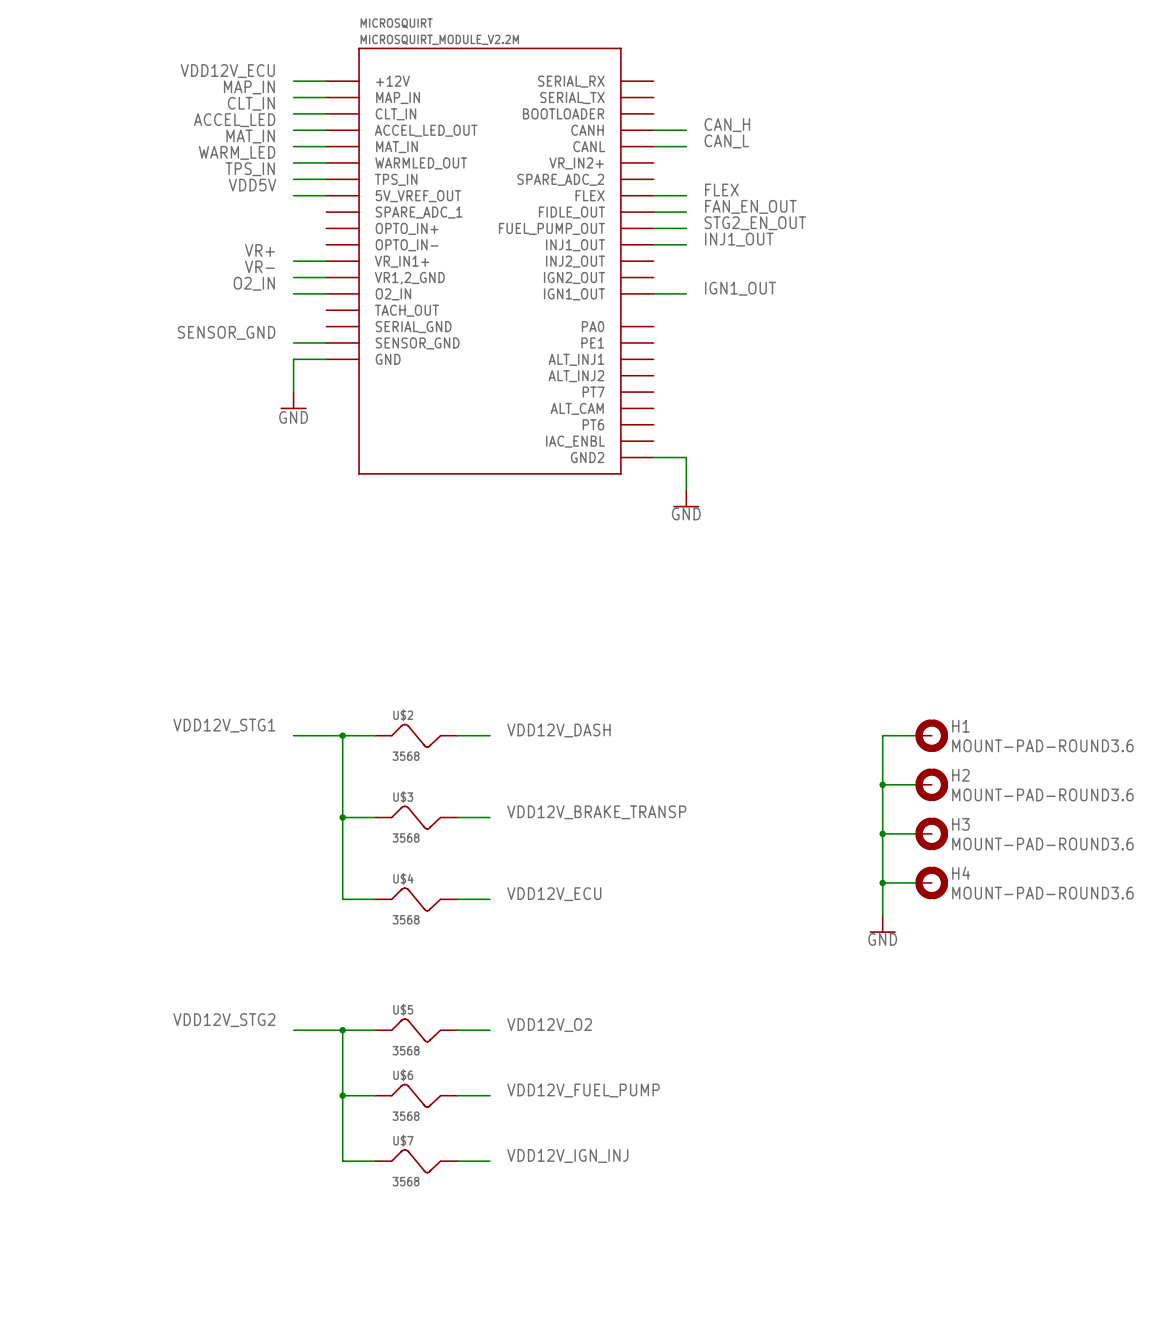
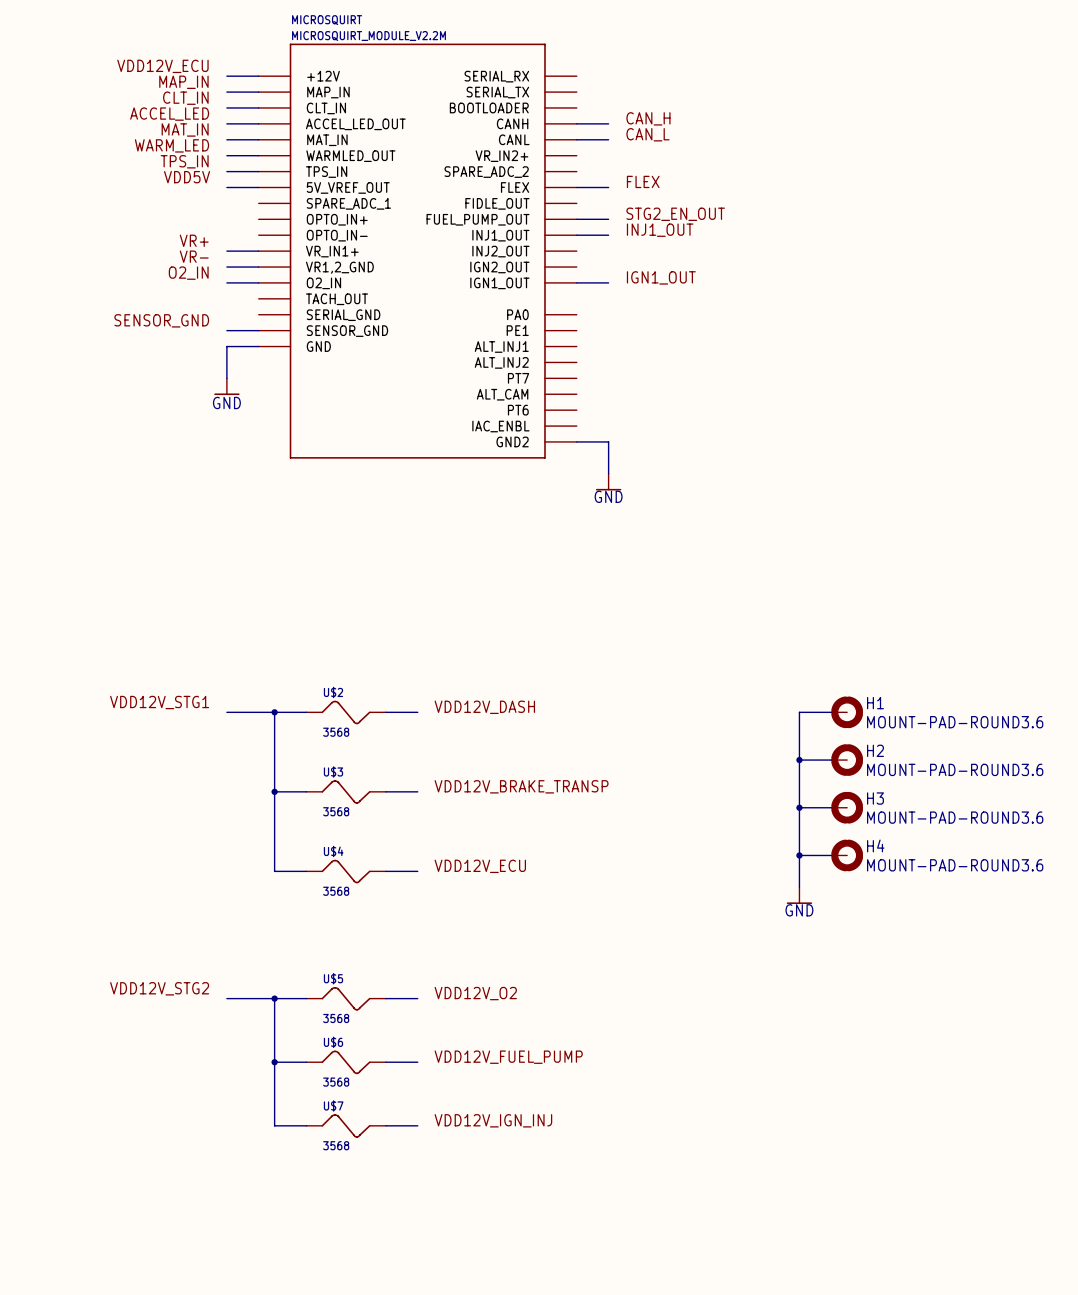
label: FAN_EN_OUT (750, 206) -> none
wire: (653, 212) (686, 212) -> none

